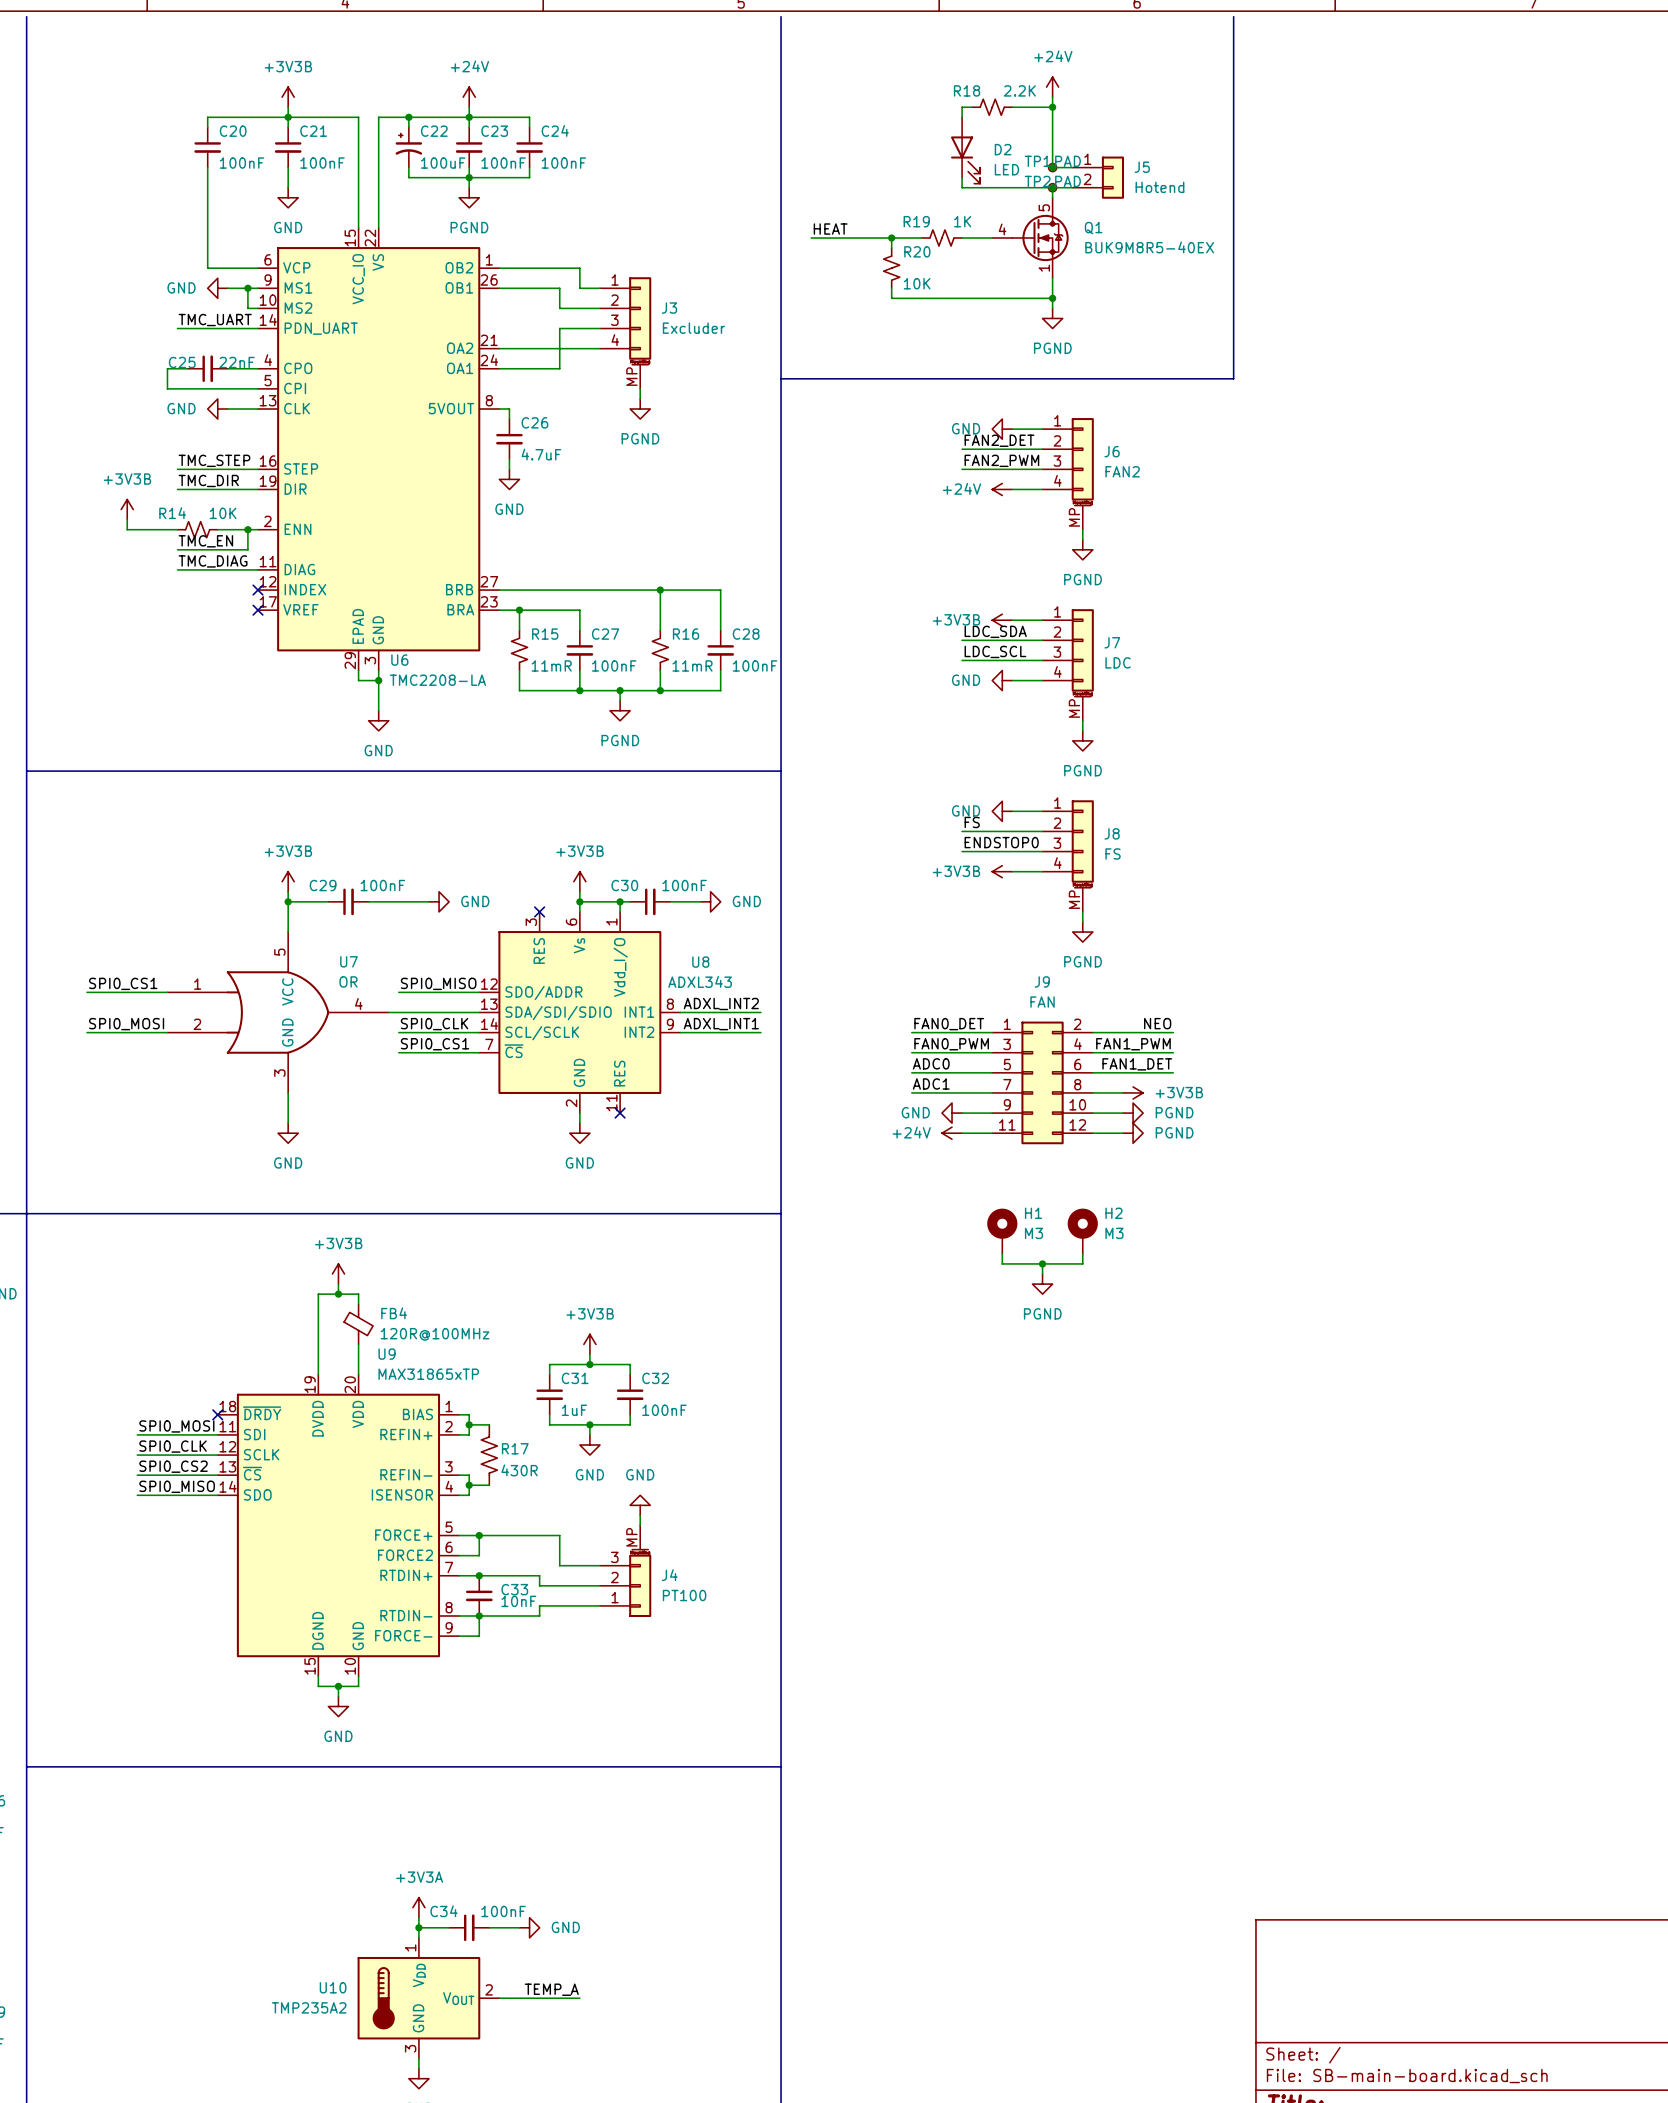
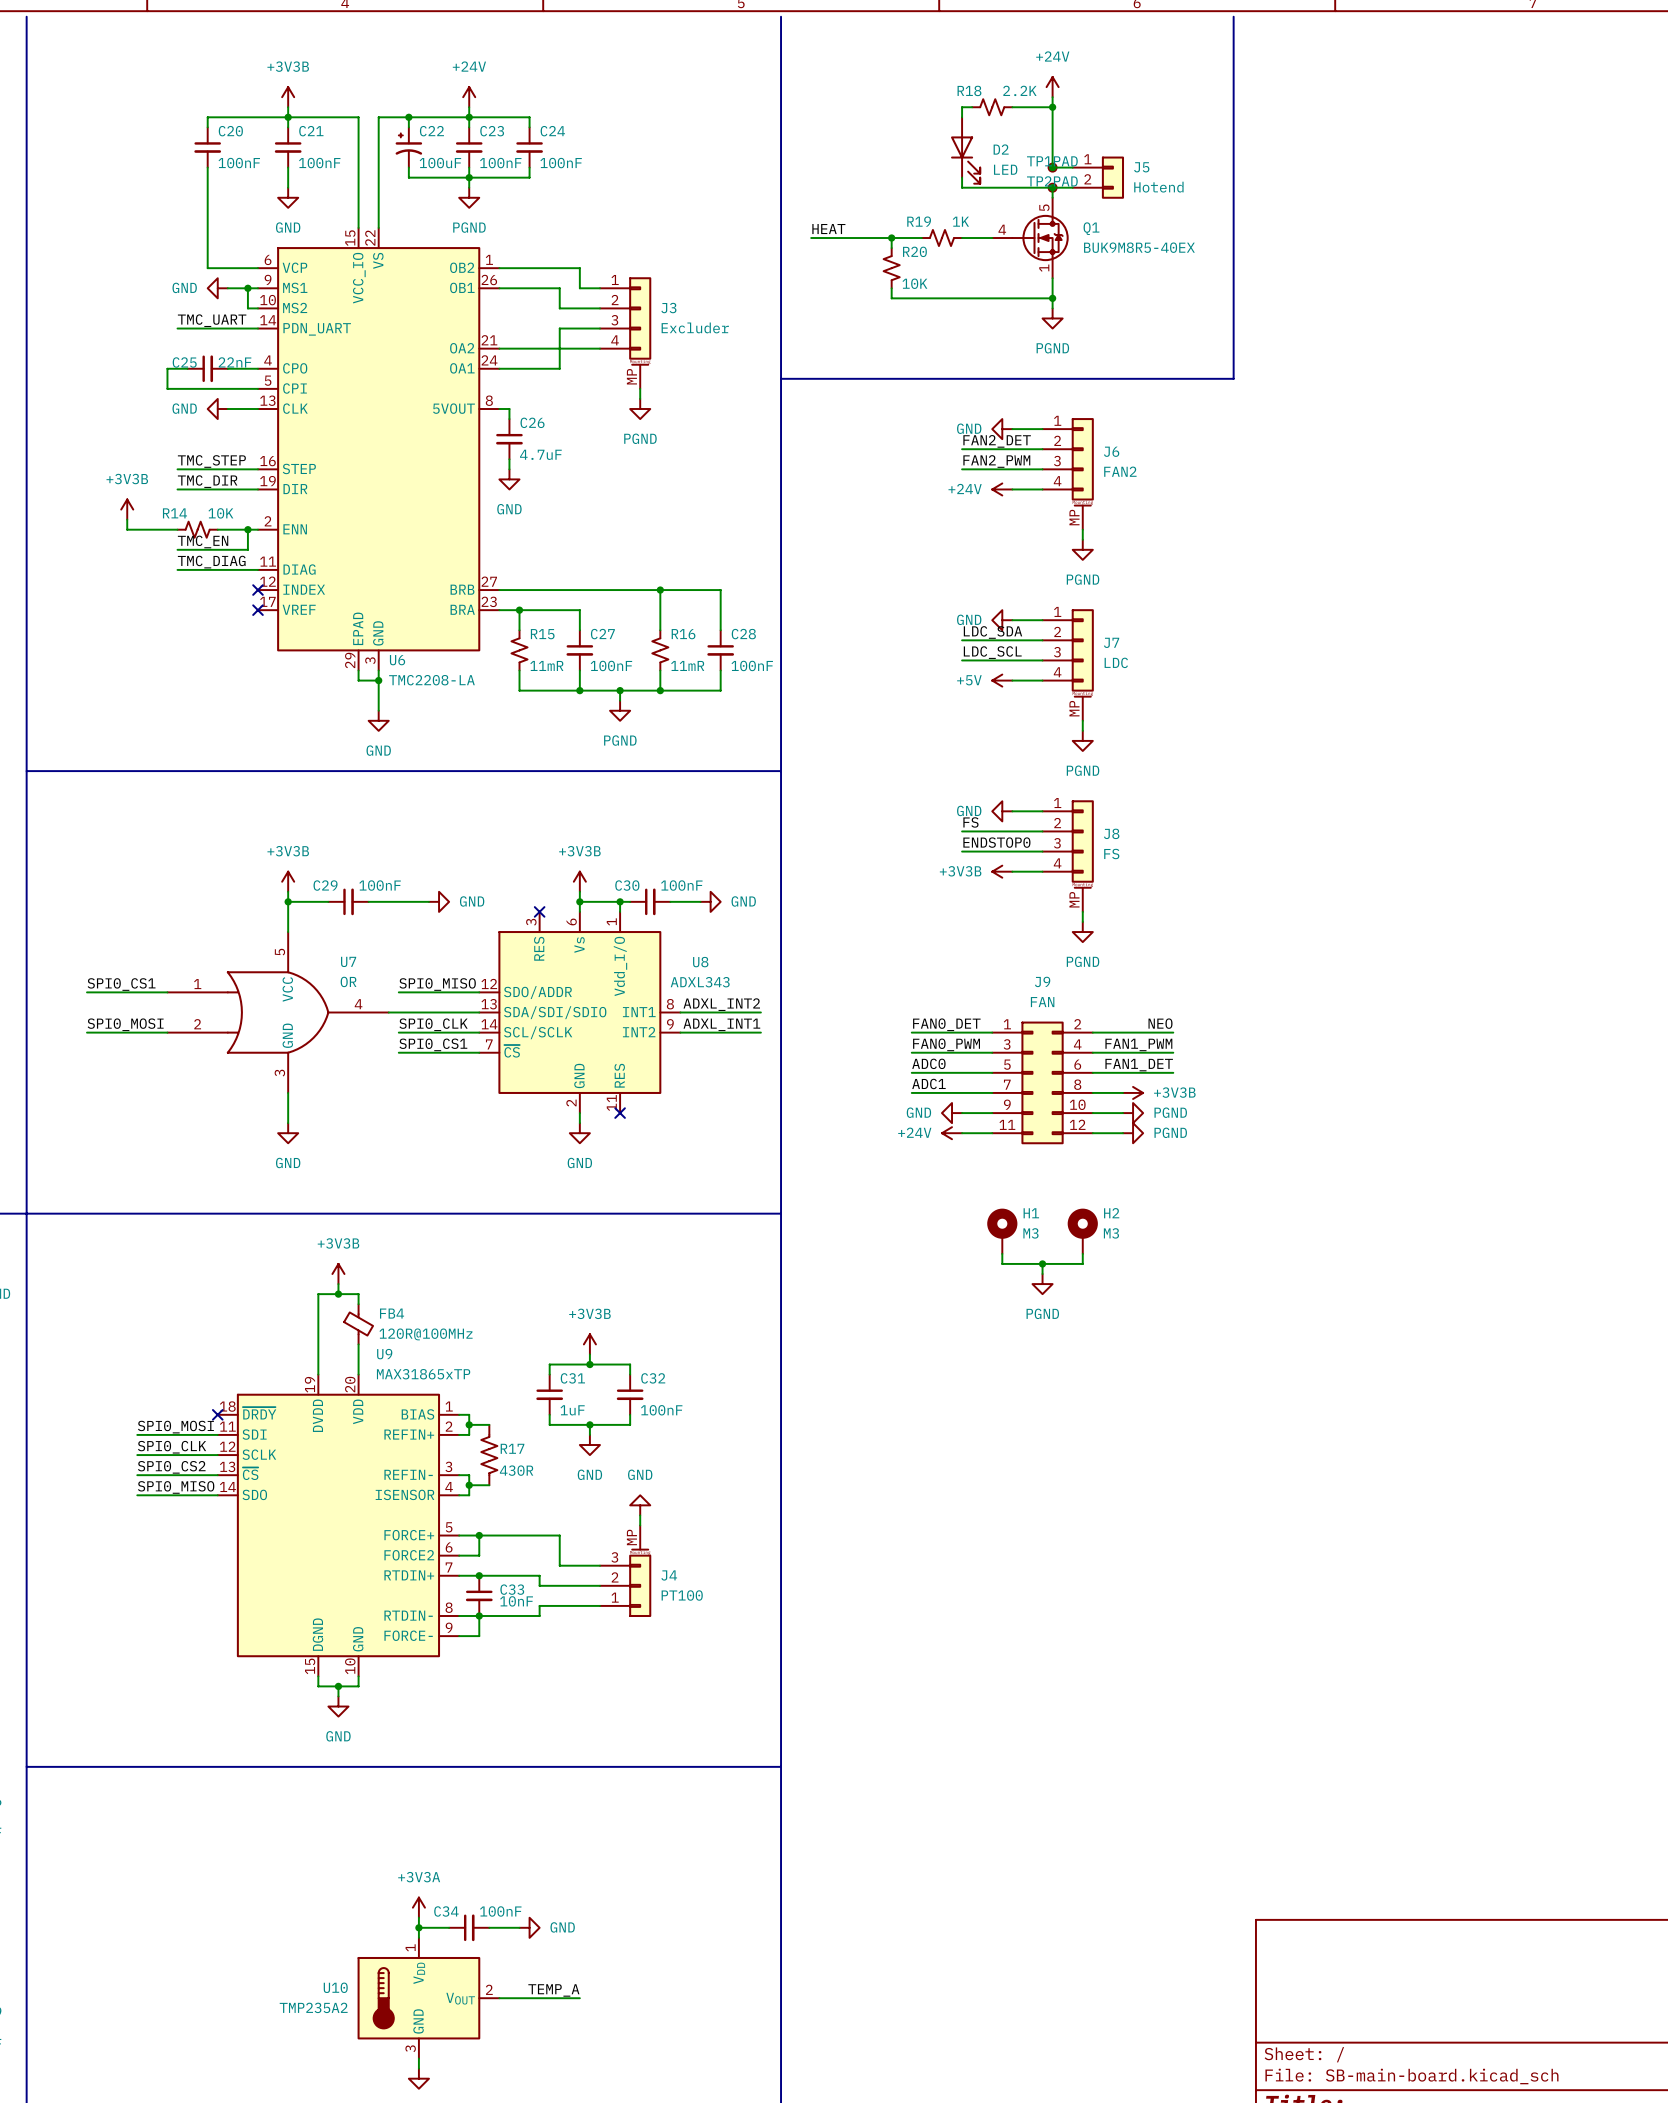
power symbol: +3V3B (1002, 620) -> GND (1002, 620)
power symbol: GND (1002, 680) -> +5V (1002, 680)

